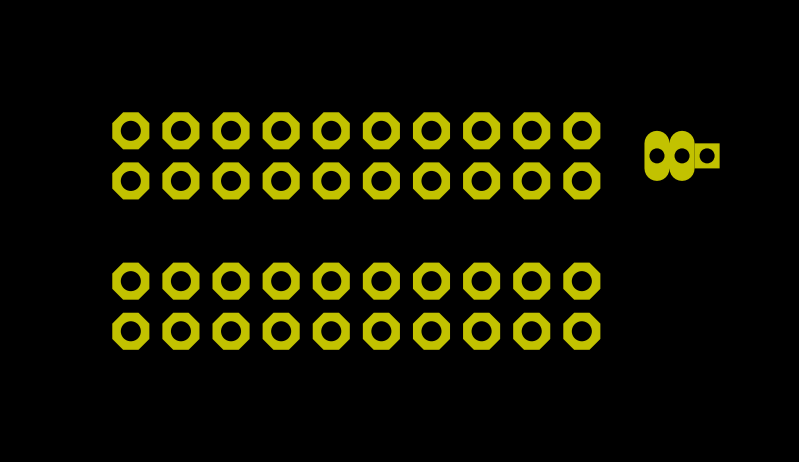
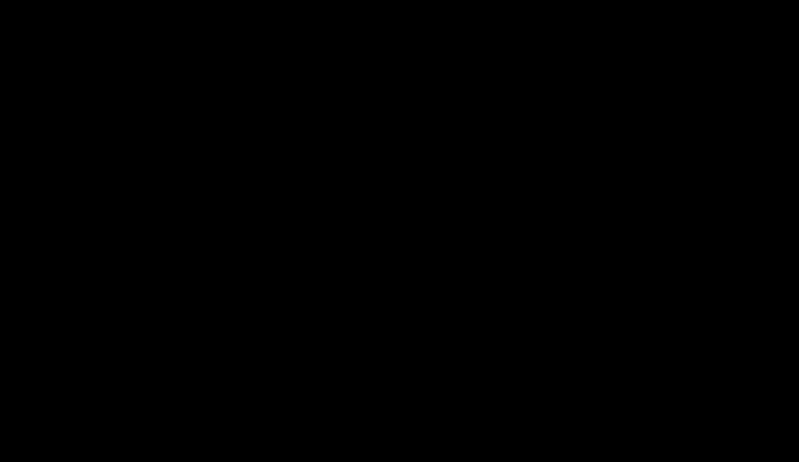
part: (356, 155) -> none
part: (682, 155) -> none
part: (356, 306) -> none

